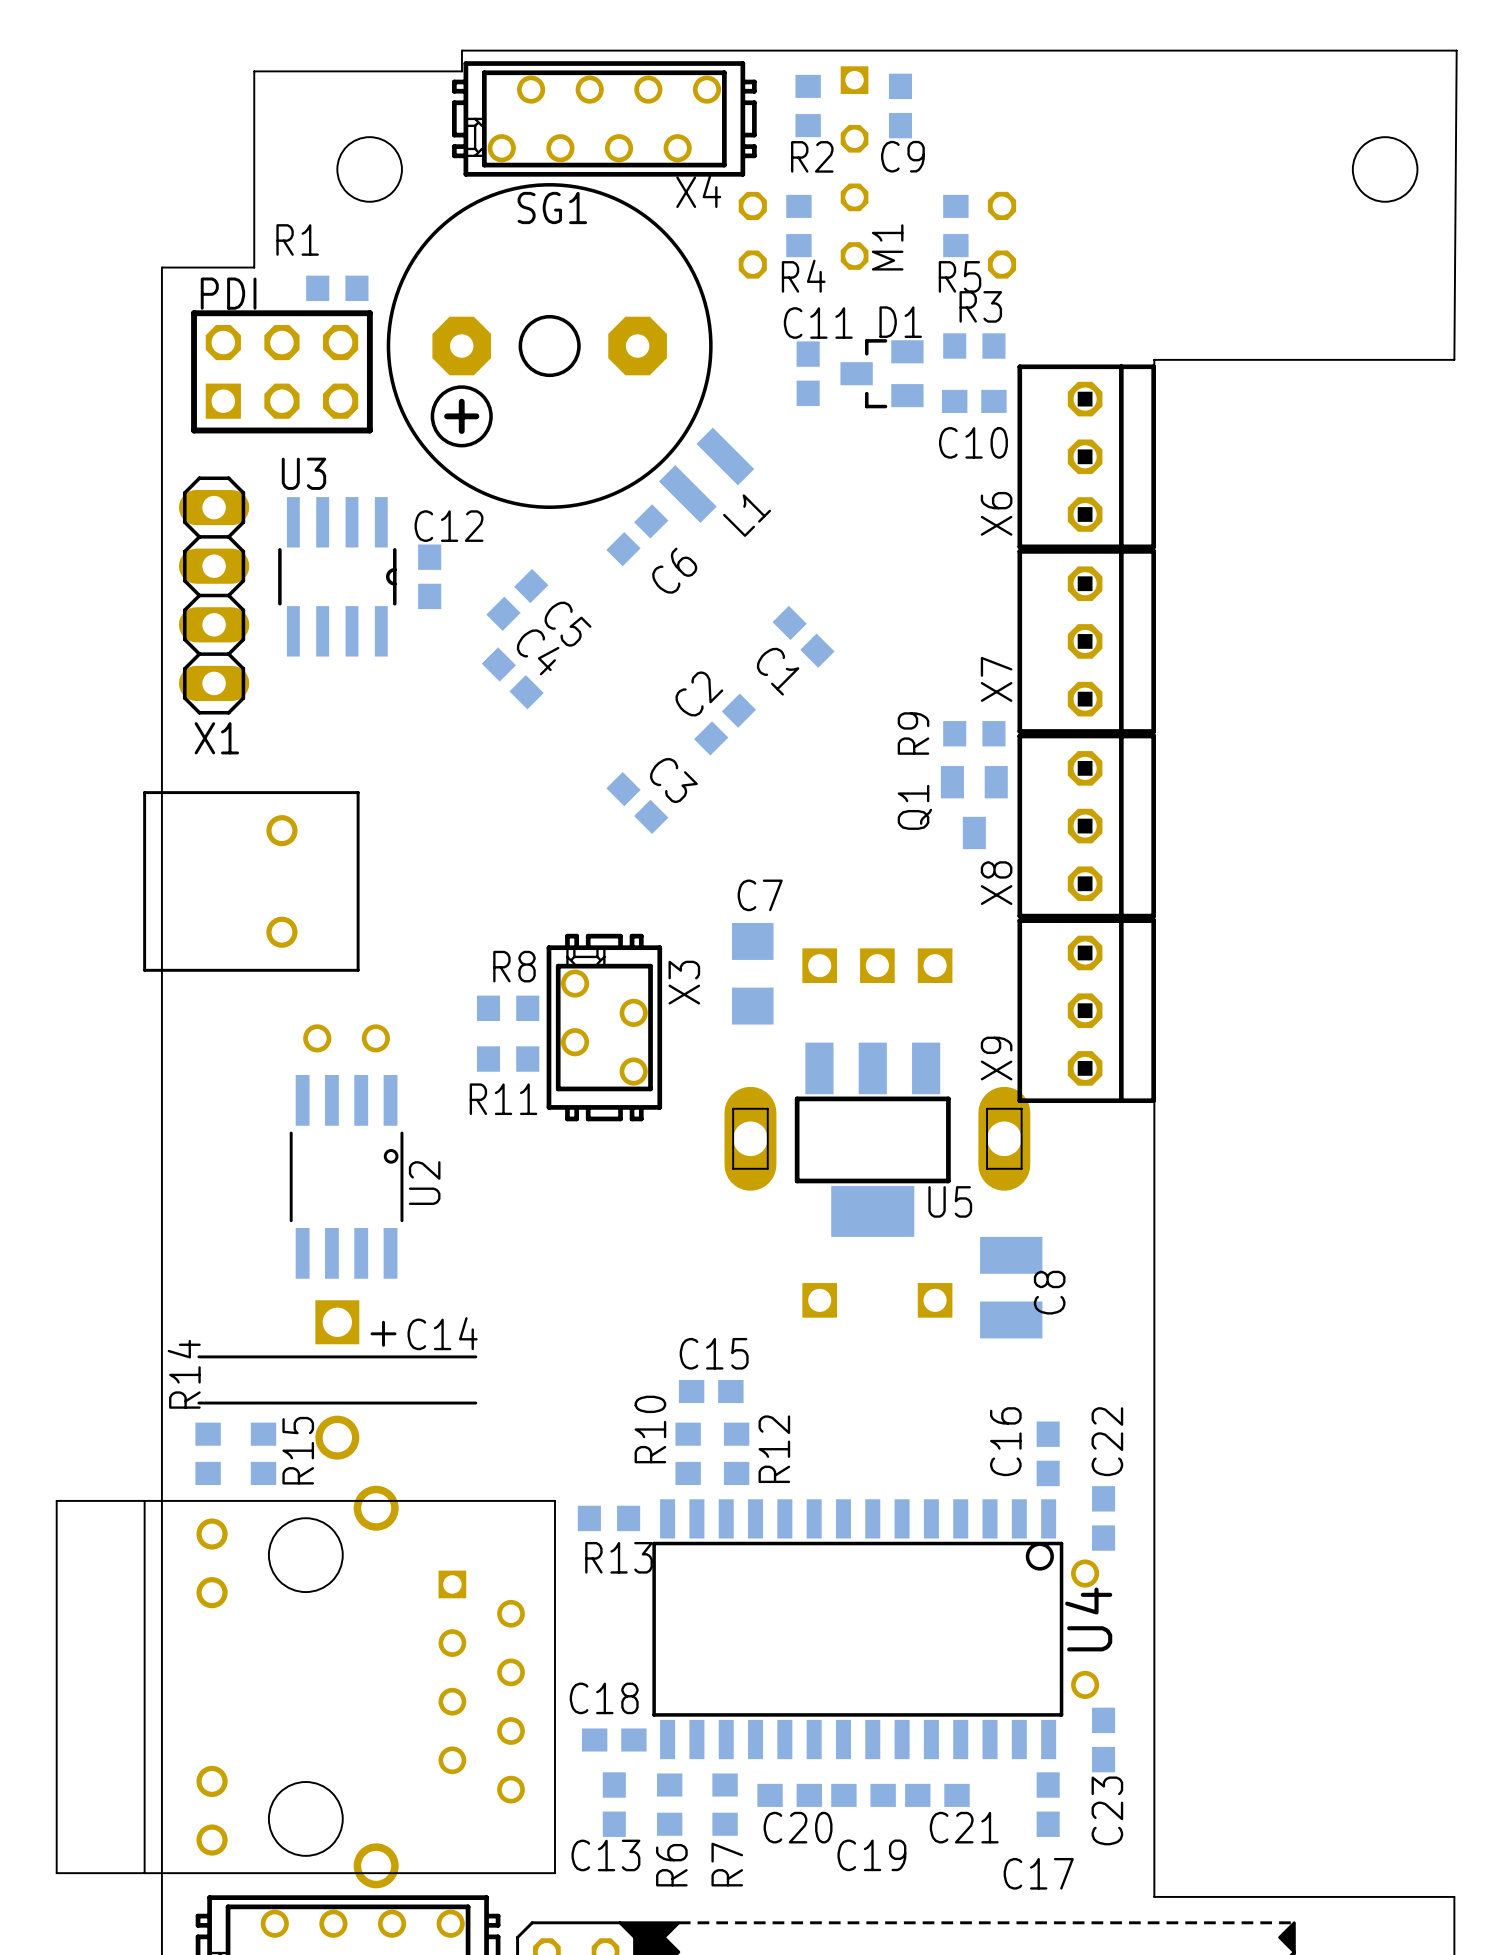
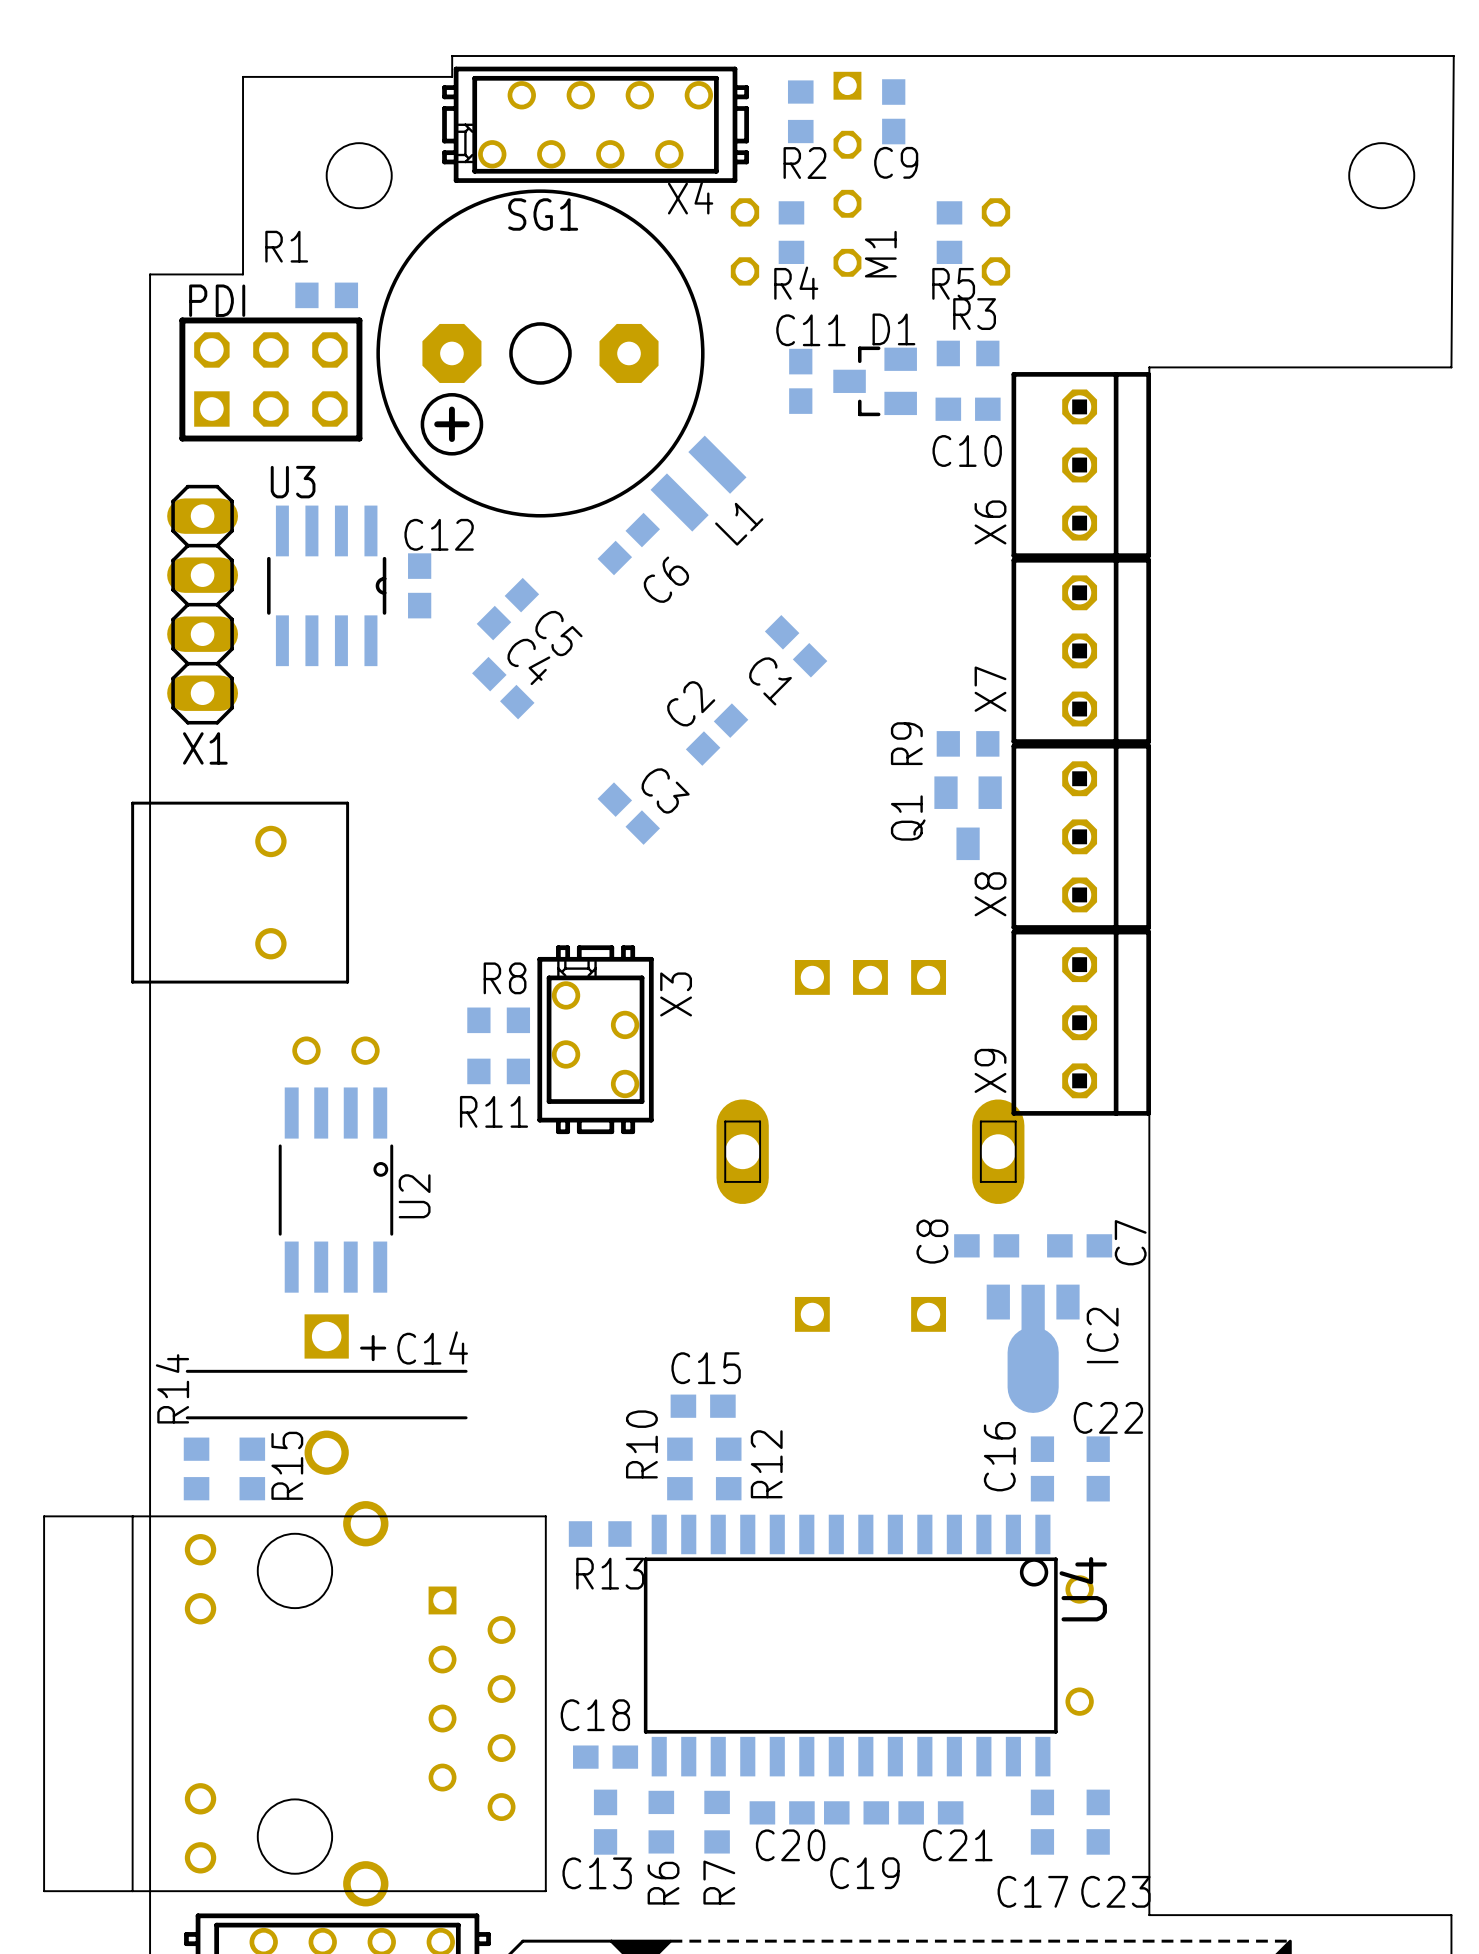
C7 name position: C7 (760, 895) -> C7 (1130, 1242)
C7 footprint: [731, 923, 774, 1025] -> [1047, 1234, 1113, 1258]
U5: (872, 1139) -> none
C8 footprint: [980, 1236, 1043, 1339] -> [954, 1234, 1020, 1258]
C8 name position: C8 (1049, 1292) -> C8 (932, 1241)
IC2: none -> (1033, 1348)
C22 name rotation: 0° (1107, 1441) -> 90° clockwise (1108, 1417)
C22 position: (1103, 1518) -> (1098, 1468)
U4 name position: U4 (1088, 1619) -> U4 (1083, 1589)
C23 position: (1103, 1740) -> (1098, 1822)
C23 name rotation: 0° (1107, 1810) -> 90° clockwise (1115, 1891)

